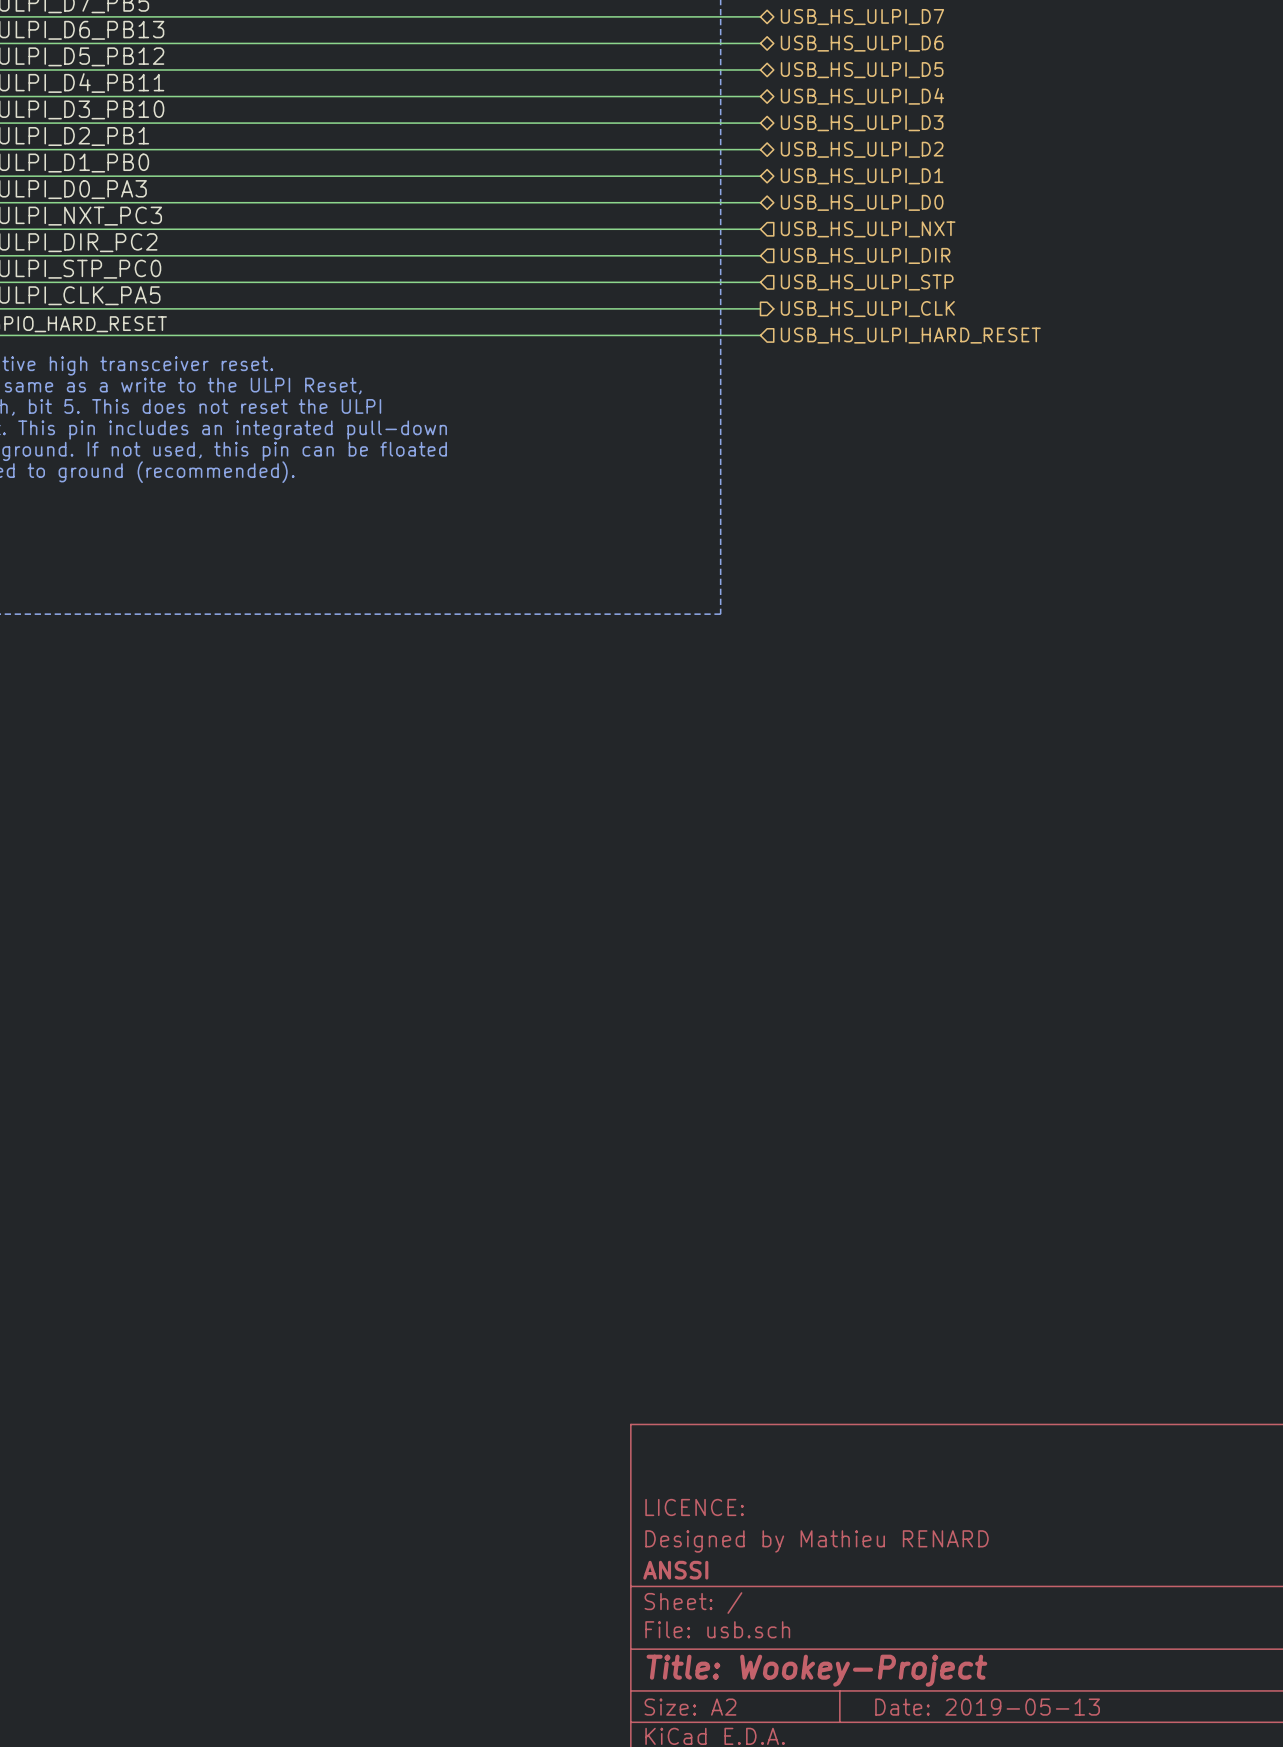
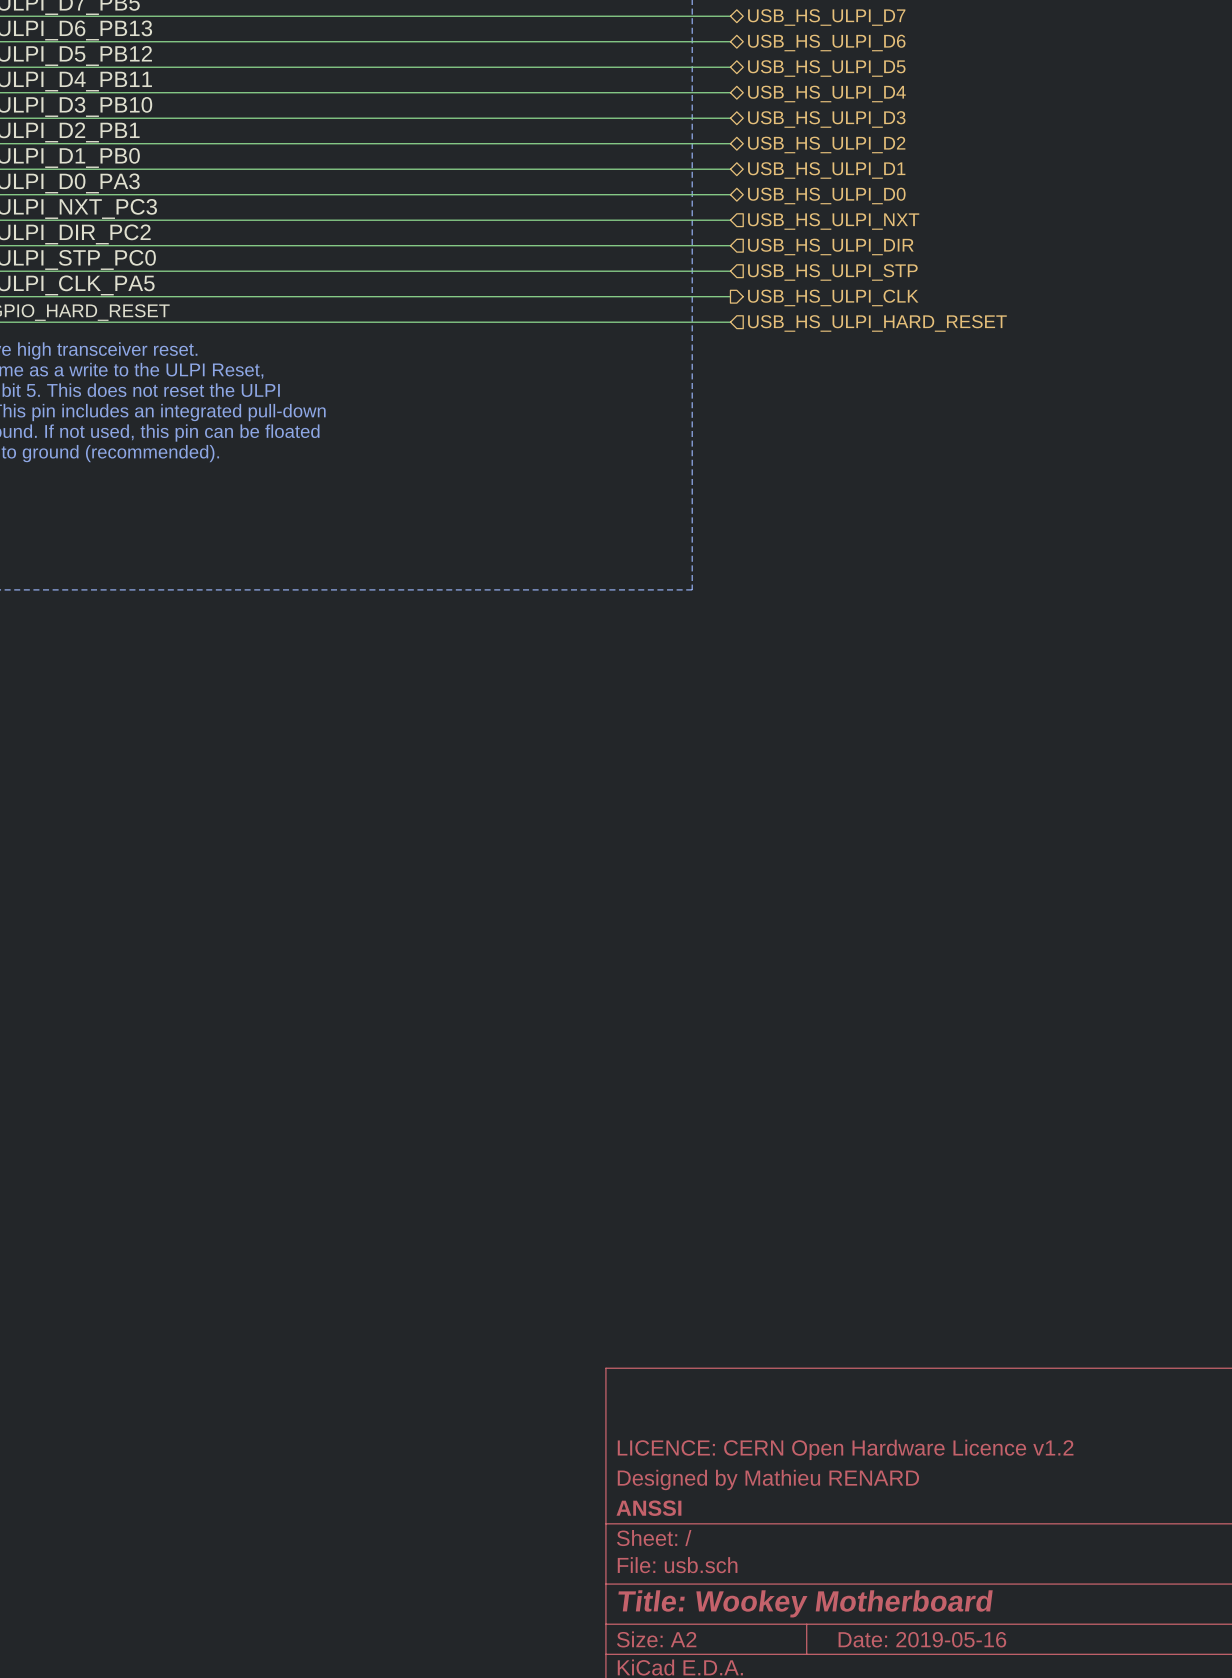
title block: LICENCE: (694, 1507) -> LICENCE: CERN Open Hardware Licence v1.2 (845, 1449)
title block: Title: Wookey-Project (816, 1670) -> Title: Wookey Motherboard (805, 1603)
title block: Date: 2019-05-13 (987, 1707) -> Date: 2019-05-16 (922, 1639)

